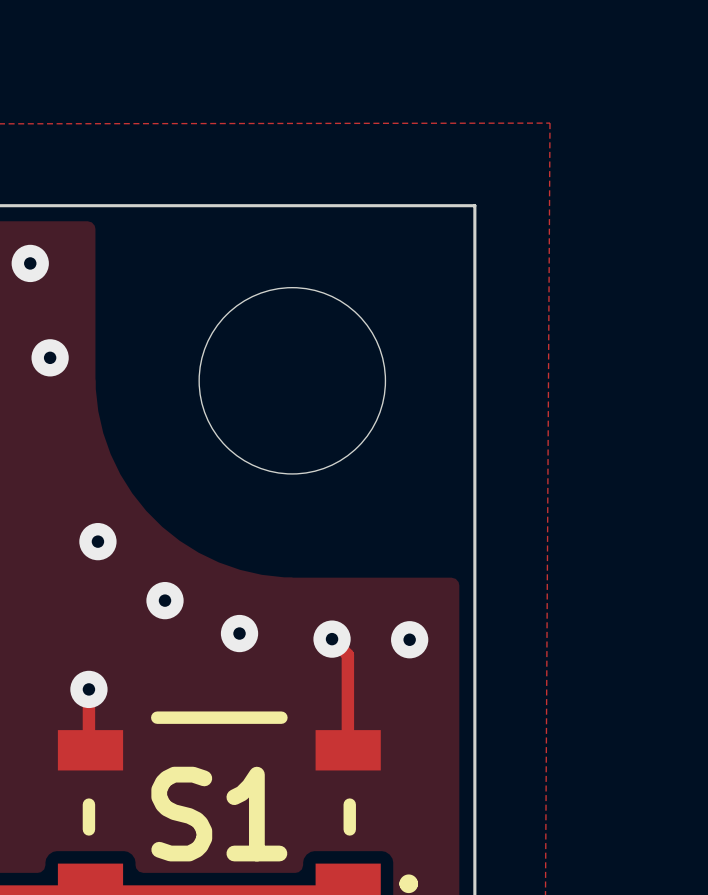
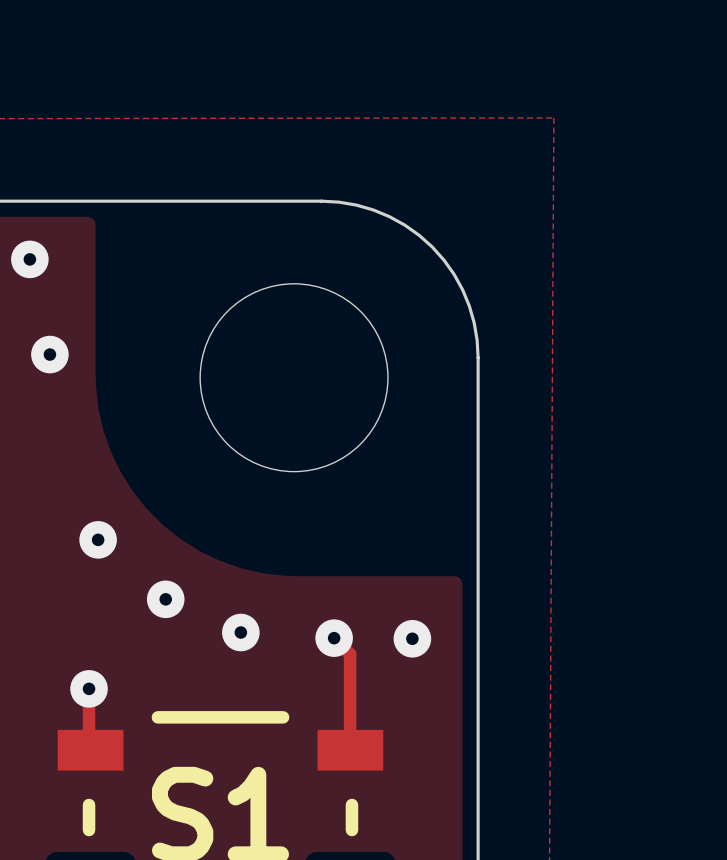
board edge: (319, 205) (474, 205) (474, 360) -> (321, 201) (356, 205) (389, 216) (404, 225) (432, 247) (443, 260) (462, 289) (474, 322) (478, 357)

